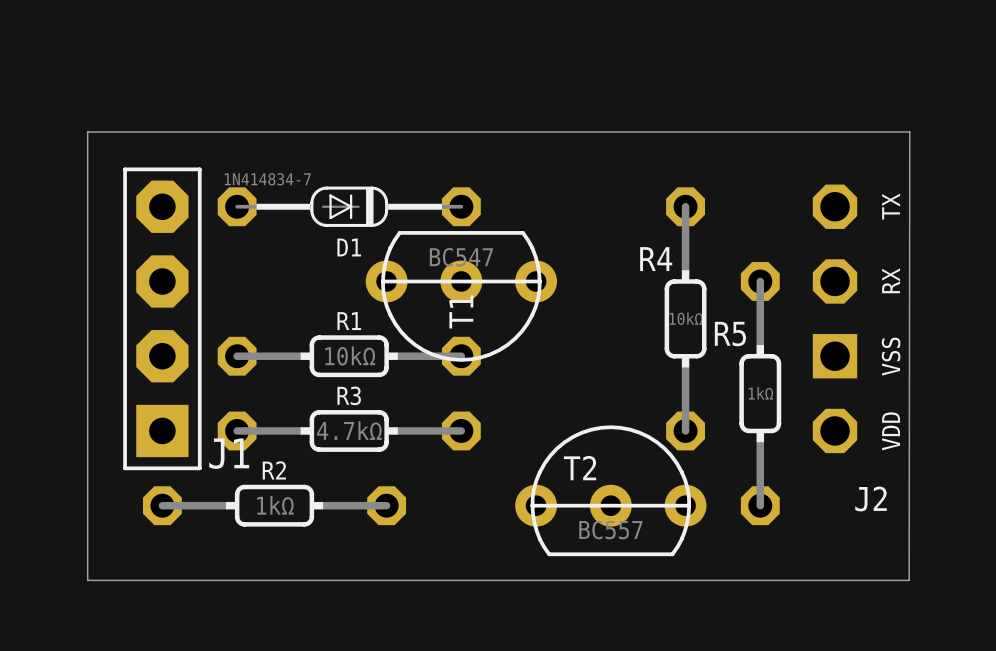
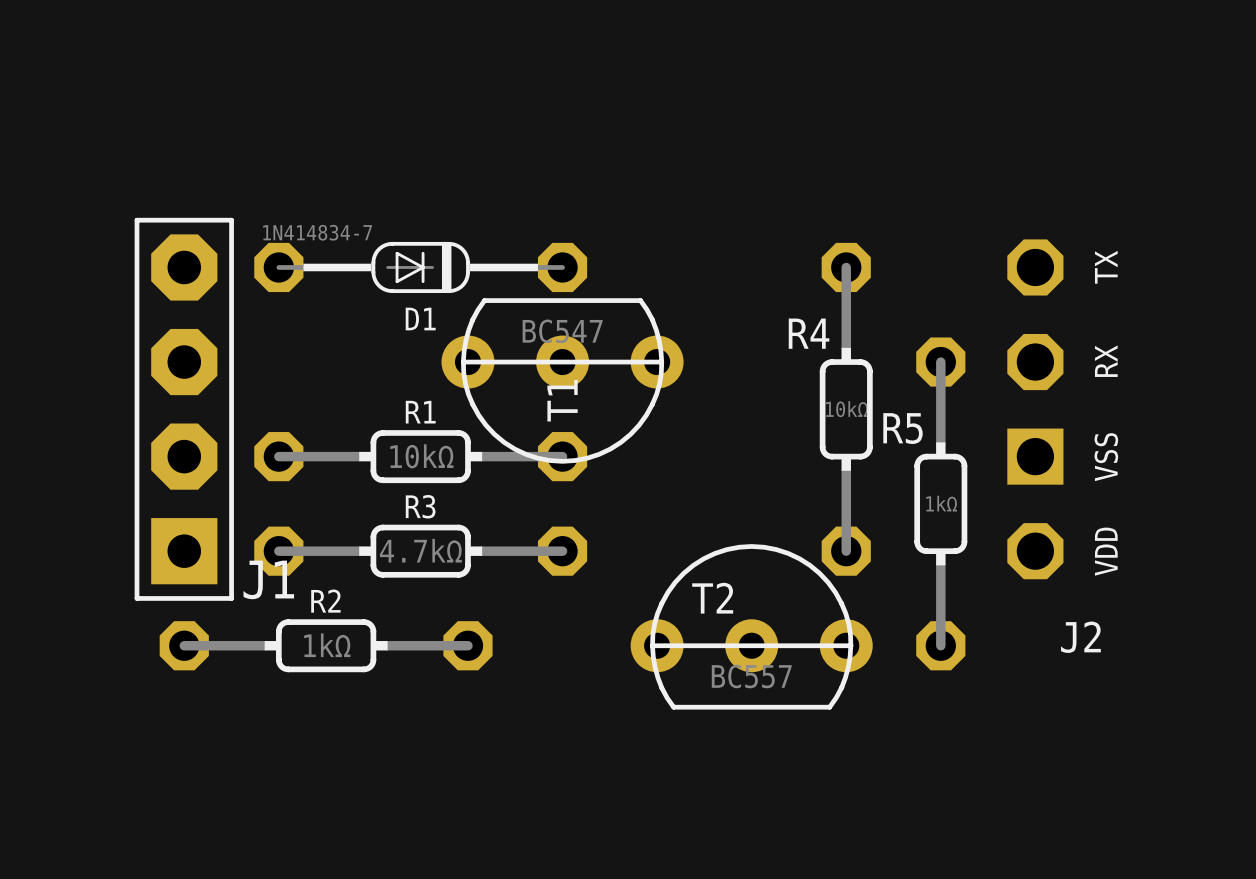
board edge: (87, 132) (909, 132) (909, 580) (87, 580) (87, 132) -> none

